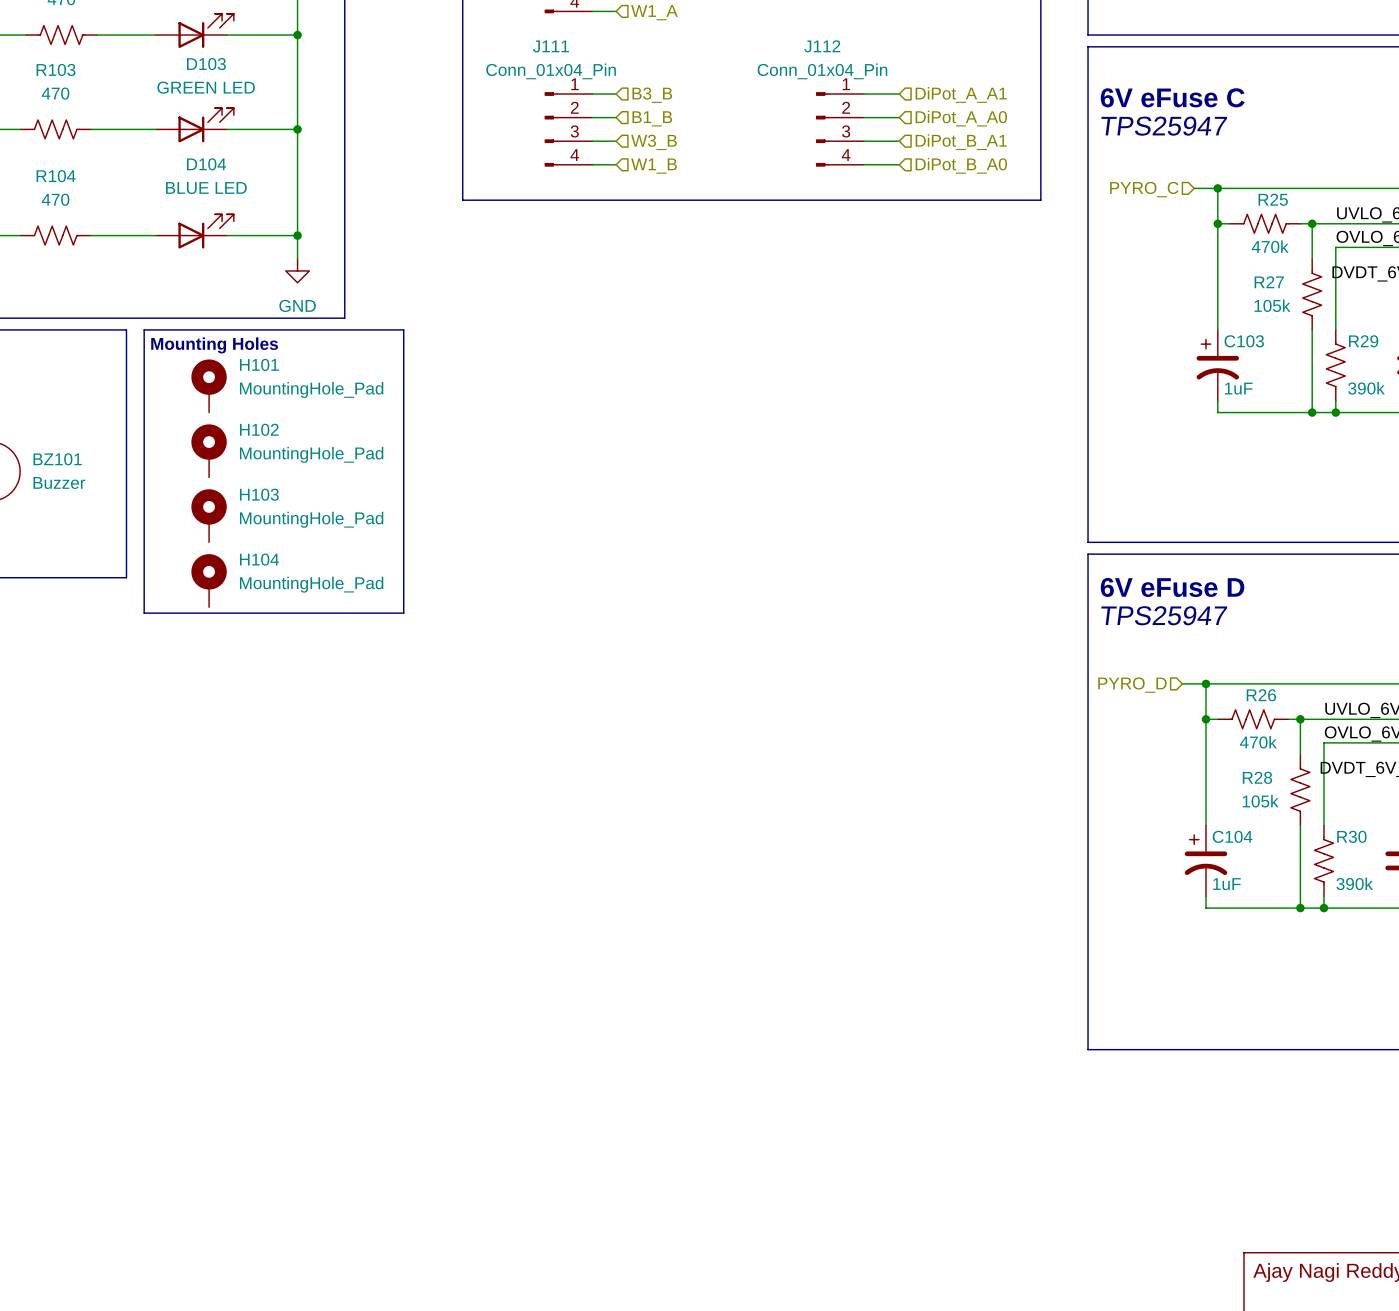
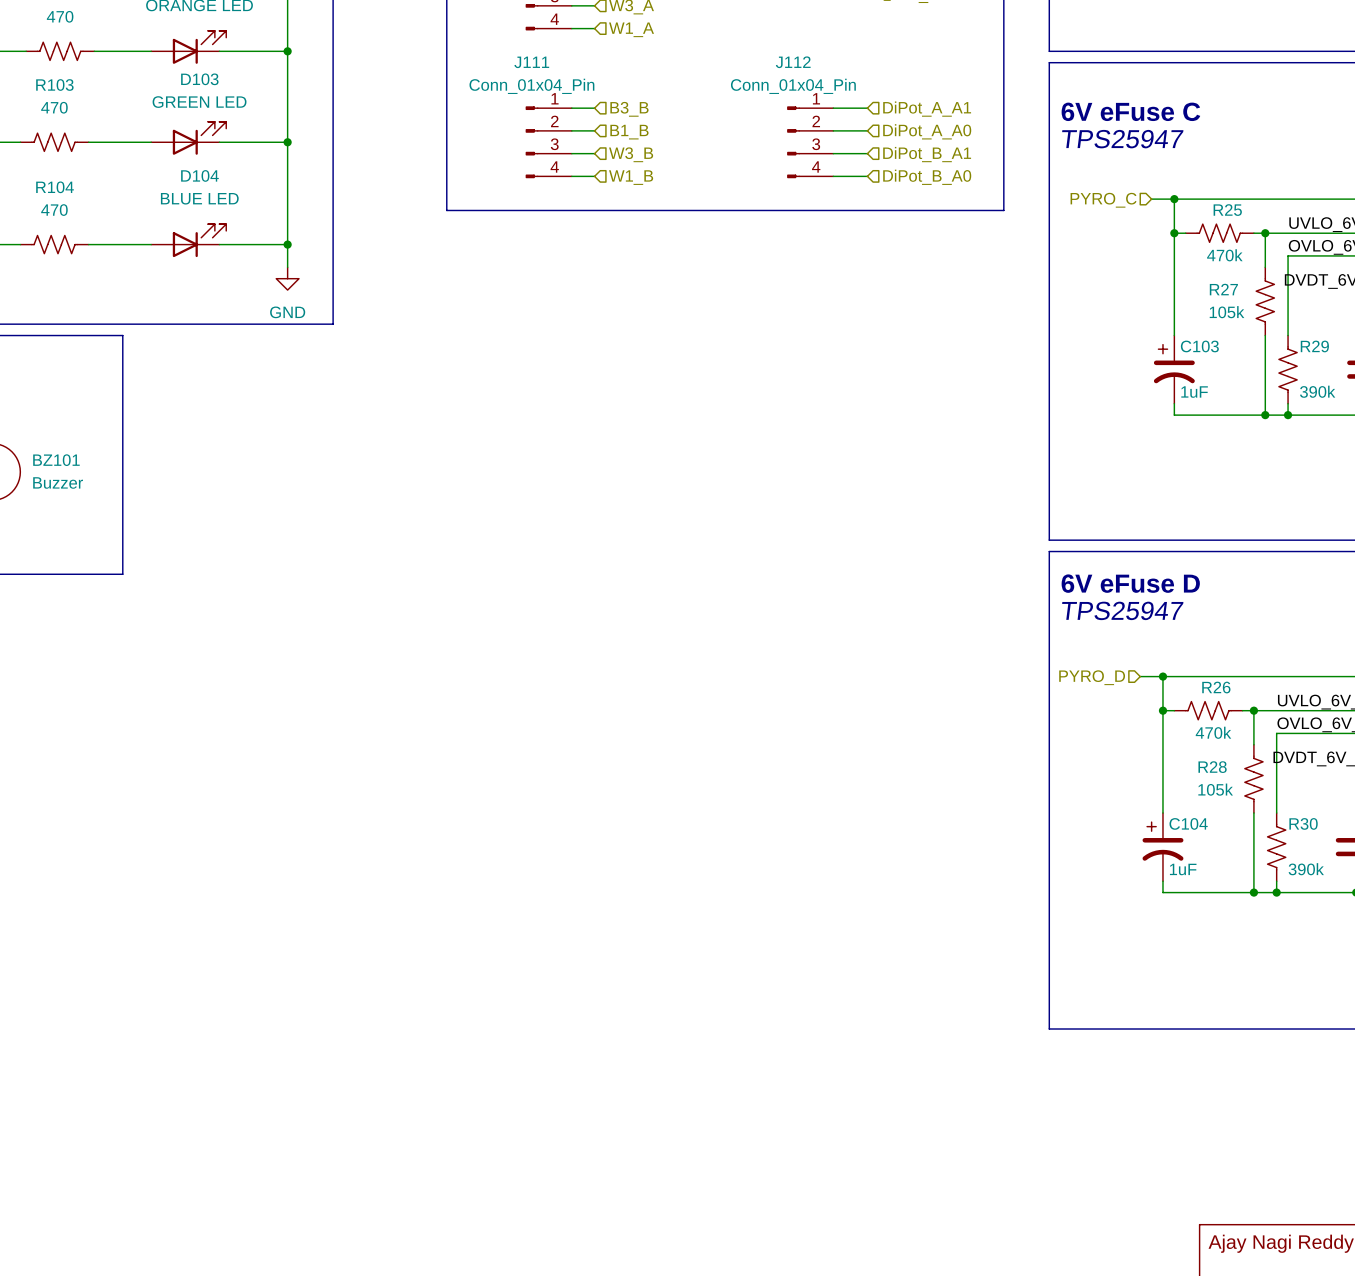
line: (144, 329) (403, 329) (403, 613) (144, 613) (144, 329) -> none
text: Mounting Holes (214, 345) -> none
H101: MountingHole_Pad (209, 386) -> none
H102: MountingHole_Pad (209, 450) -> none
H103: MountingHole_Pad (209, 515) -> none
H104: MountingHole_Pad (209, 580) -> none

